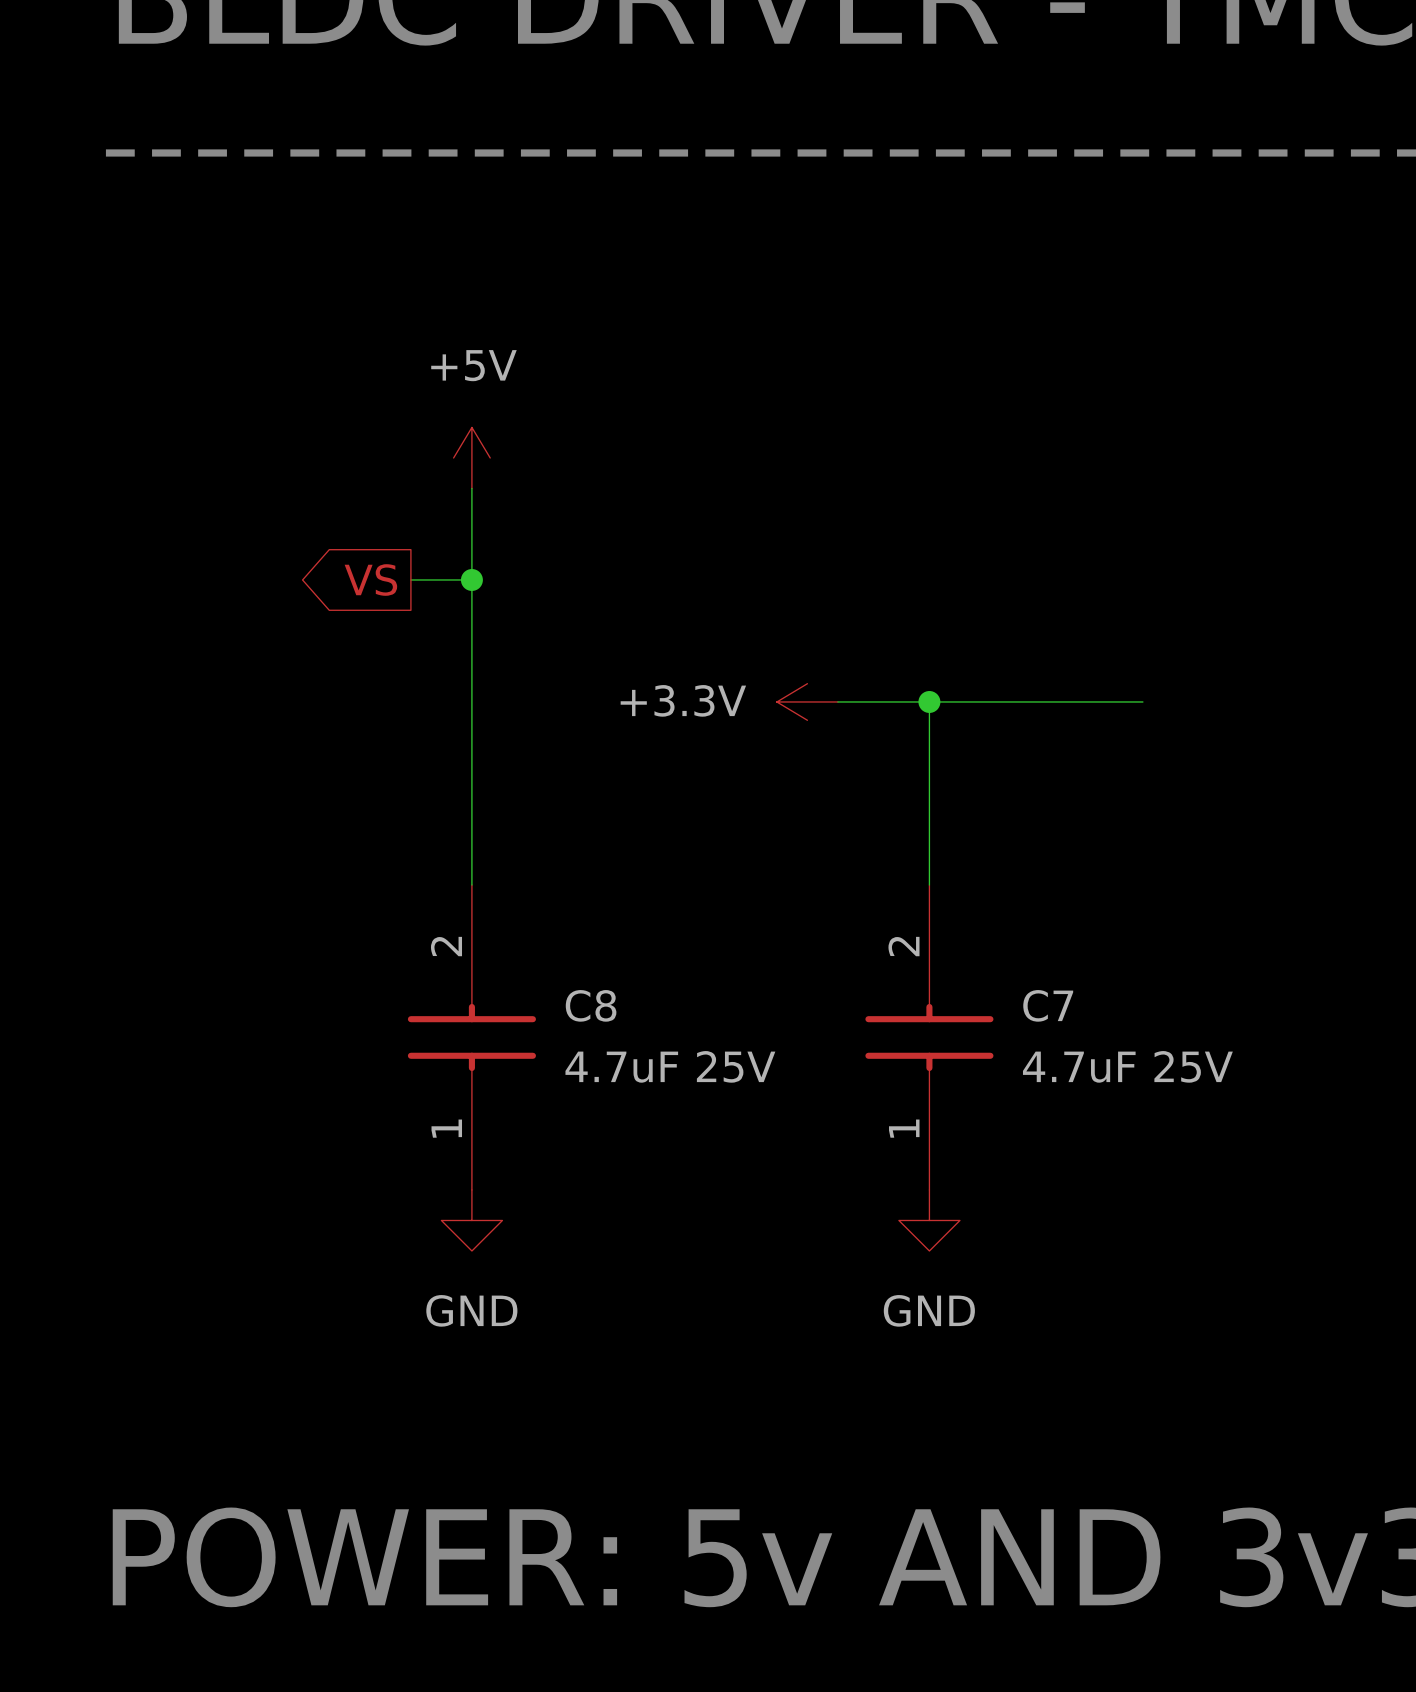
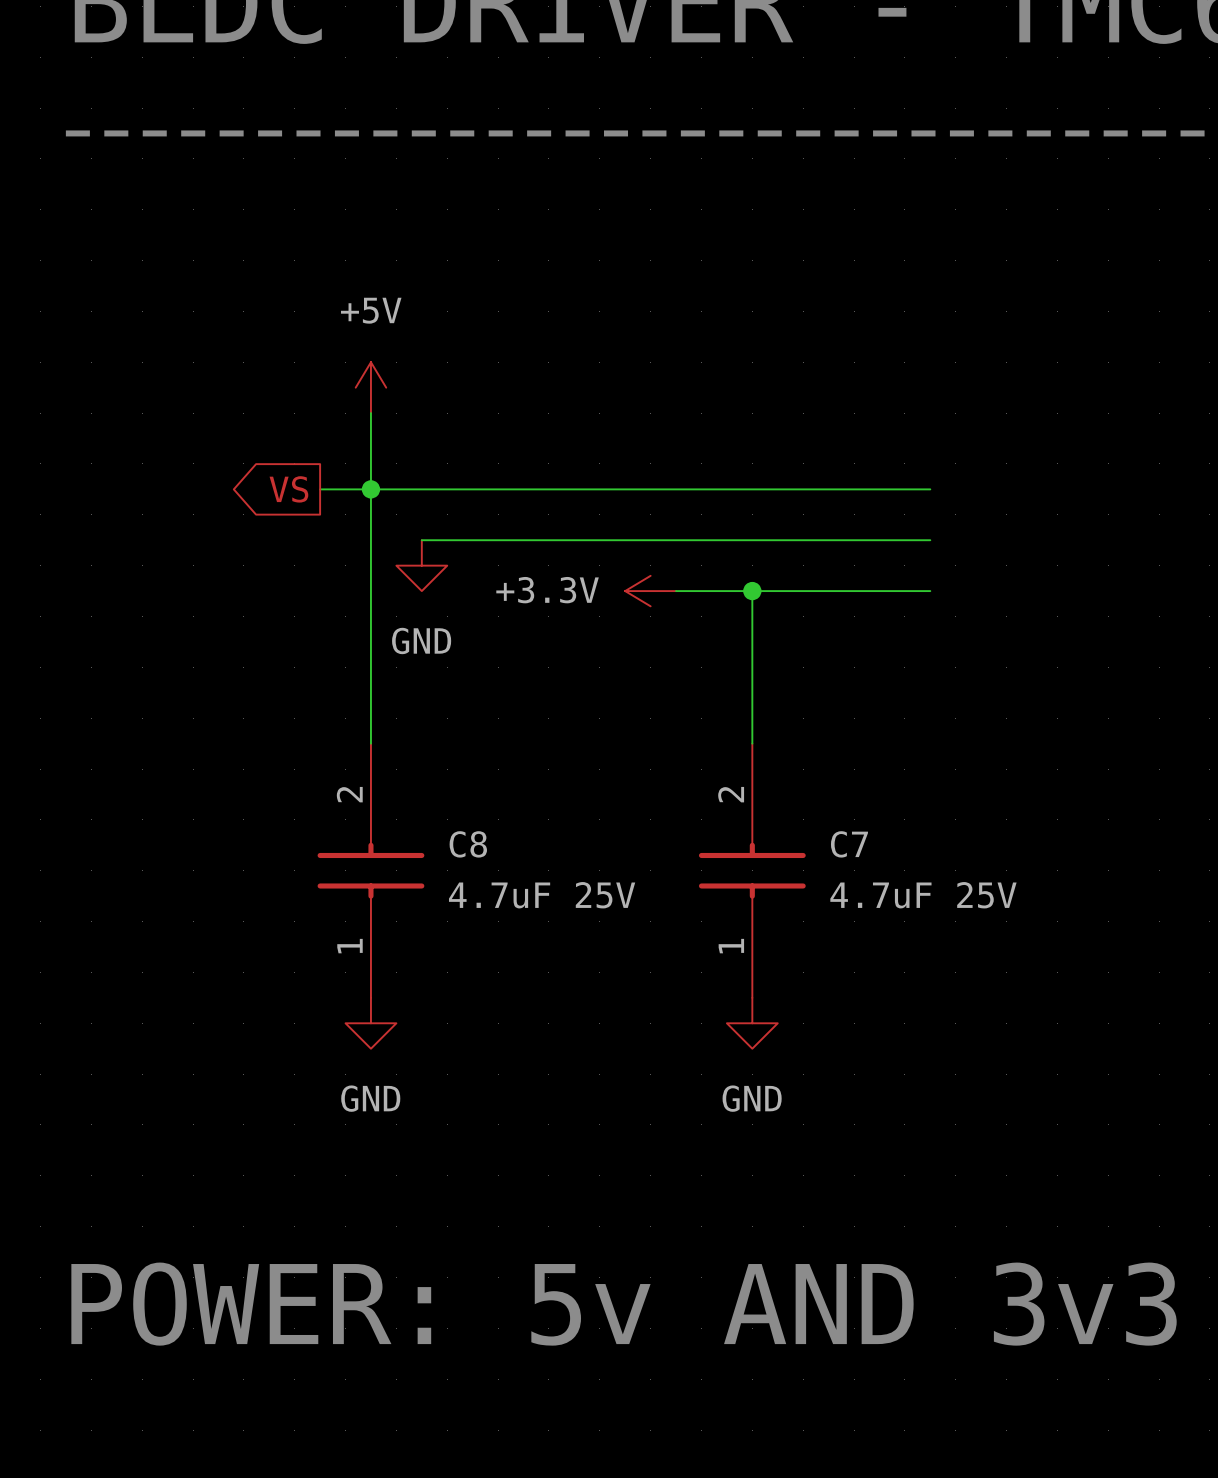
wire: none -> (370, 489) (930, 489)
wire: none -> (421, 540) (930, 540)
power symbol: none -> GND (421, 565)

